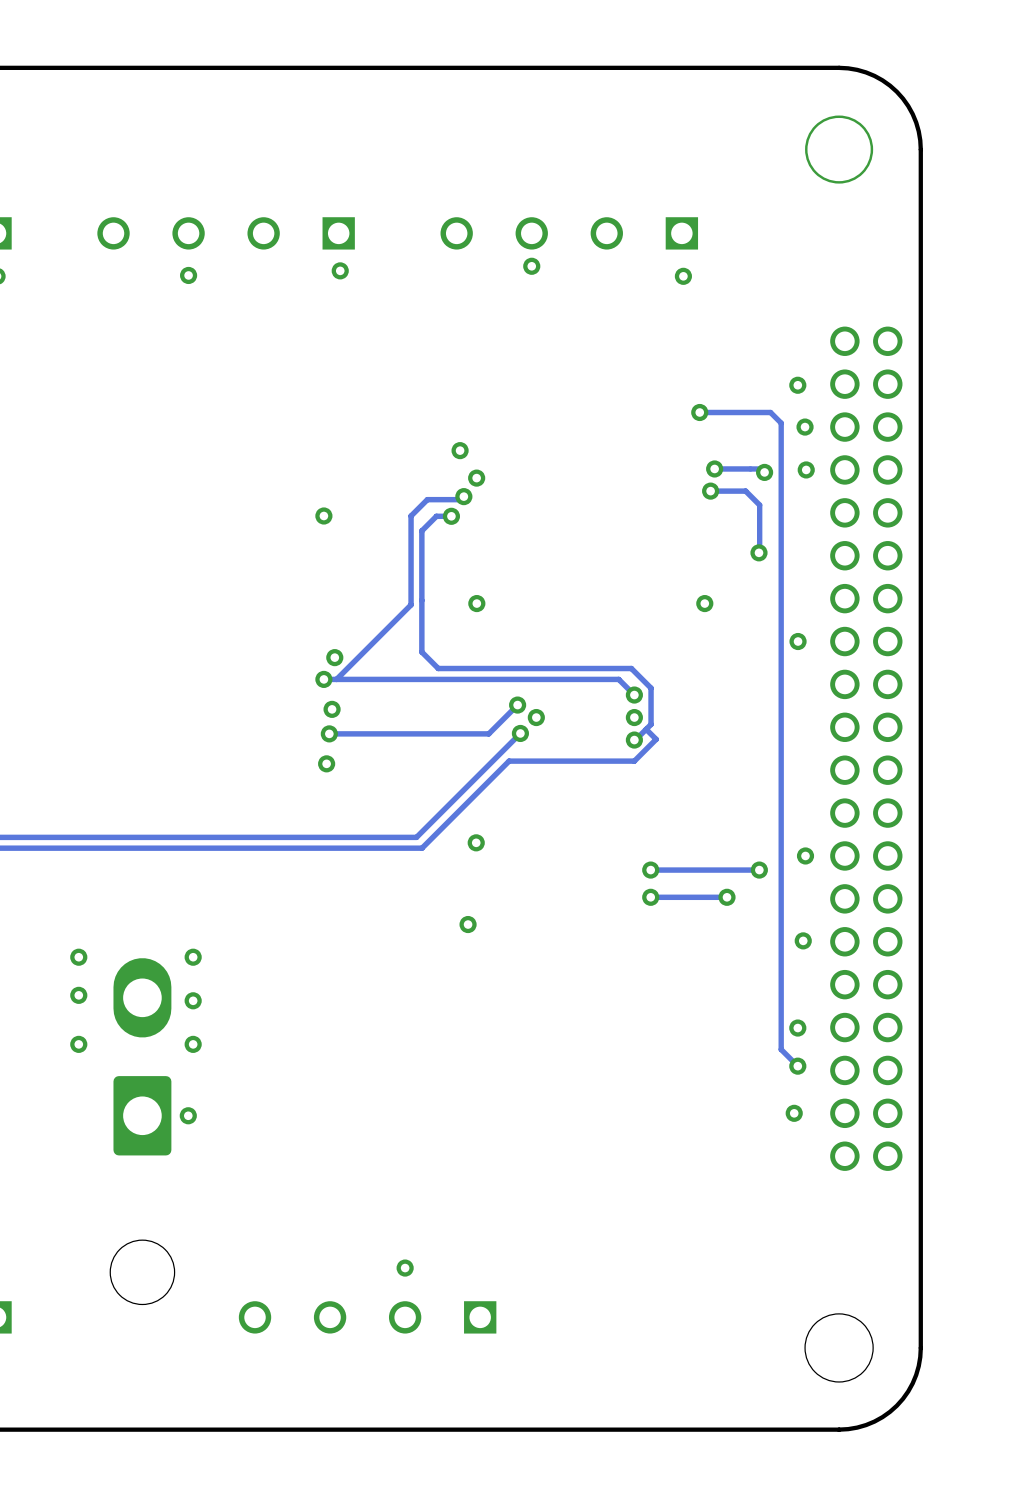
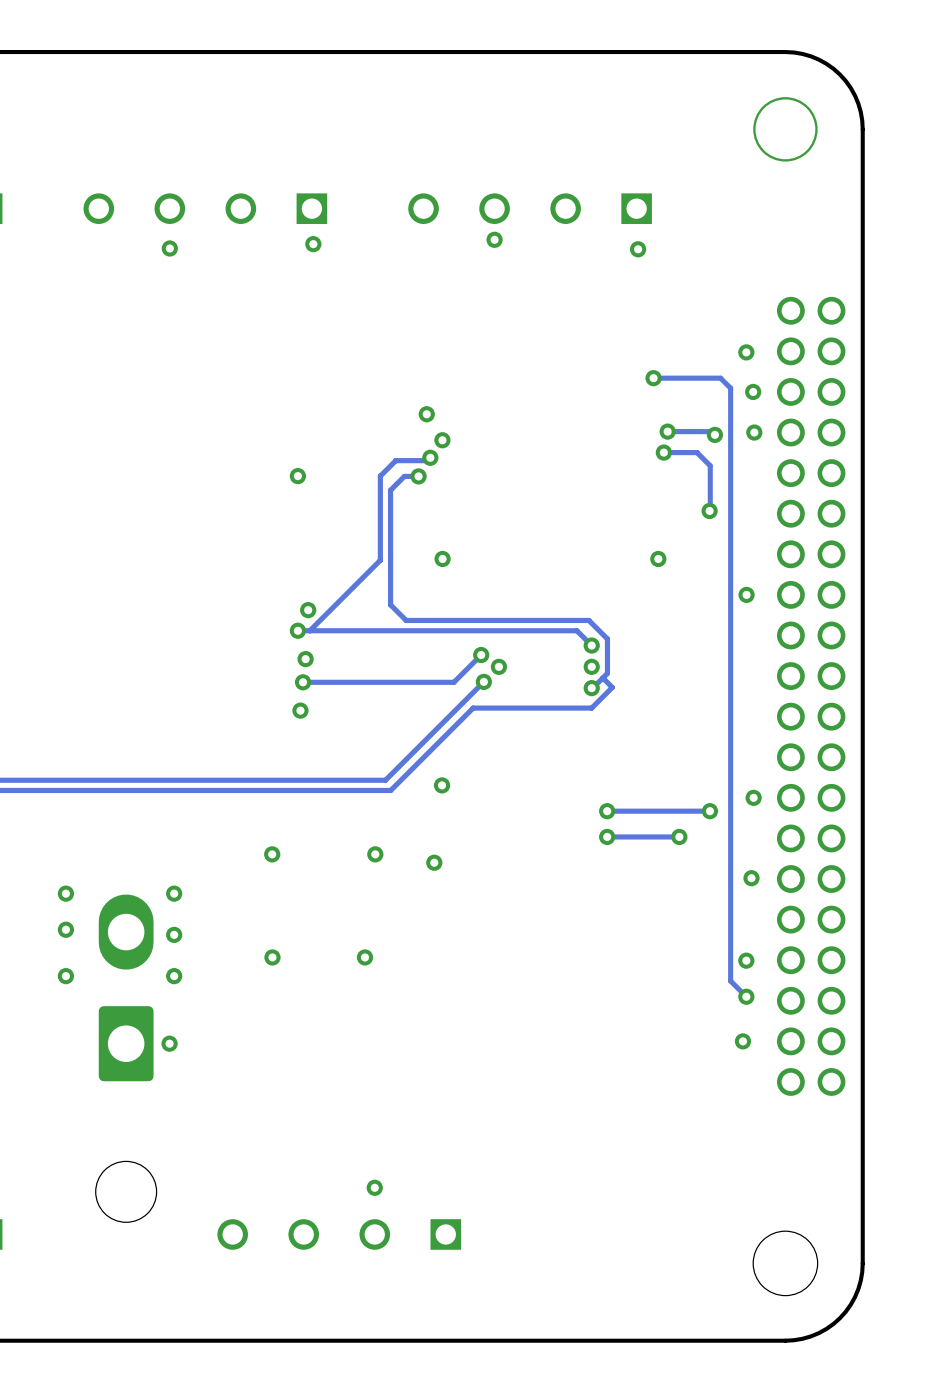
via: none -> (272, 854)
via: none -> (375, 854)
via: none -> (272, 957)
via: none -> (365, 957)

